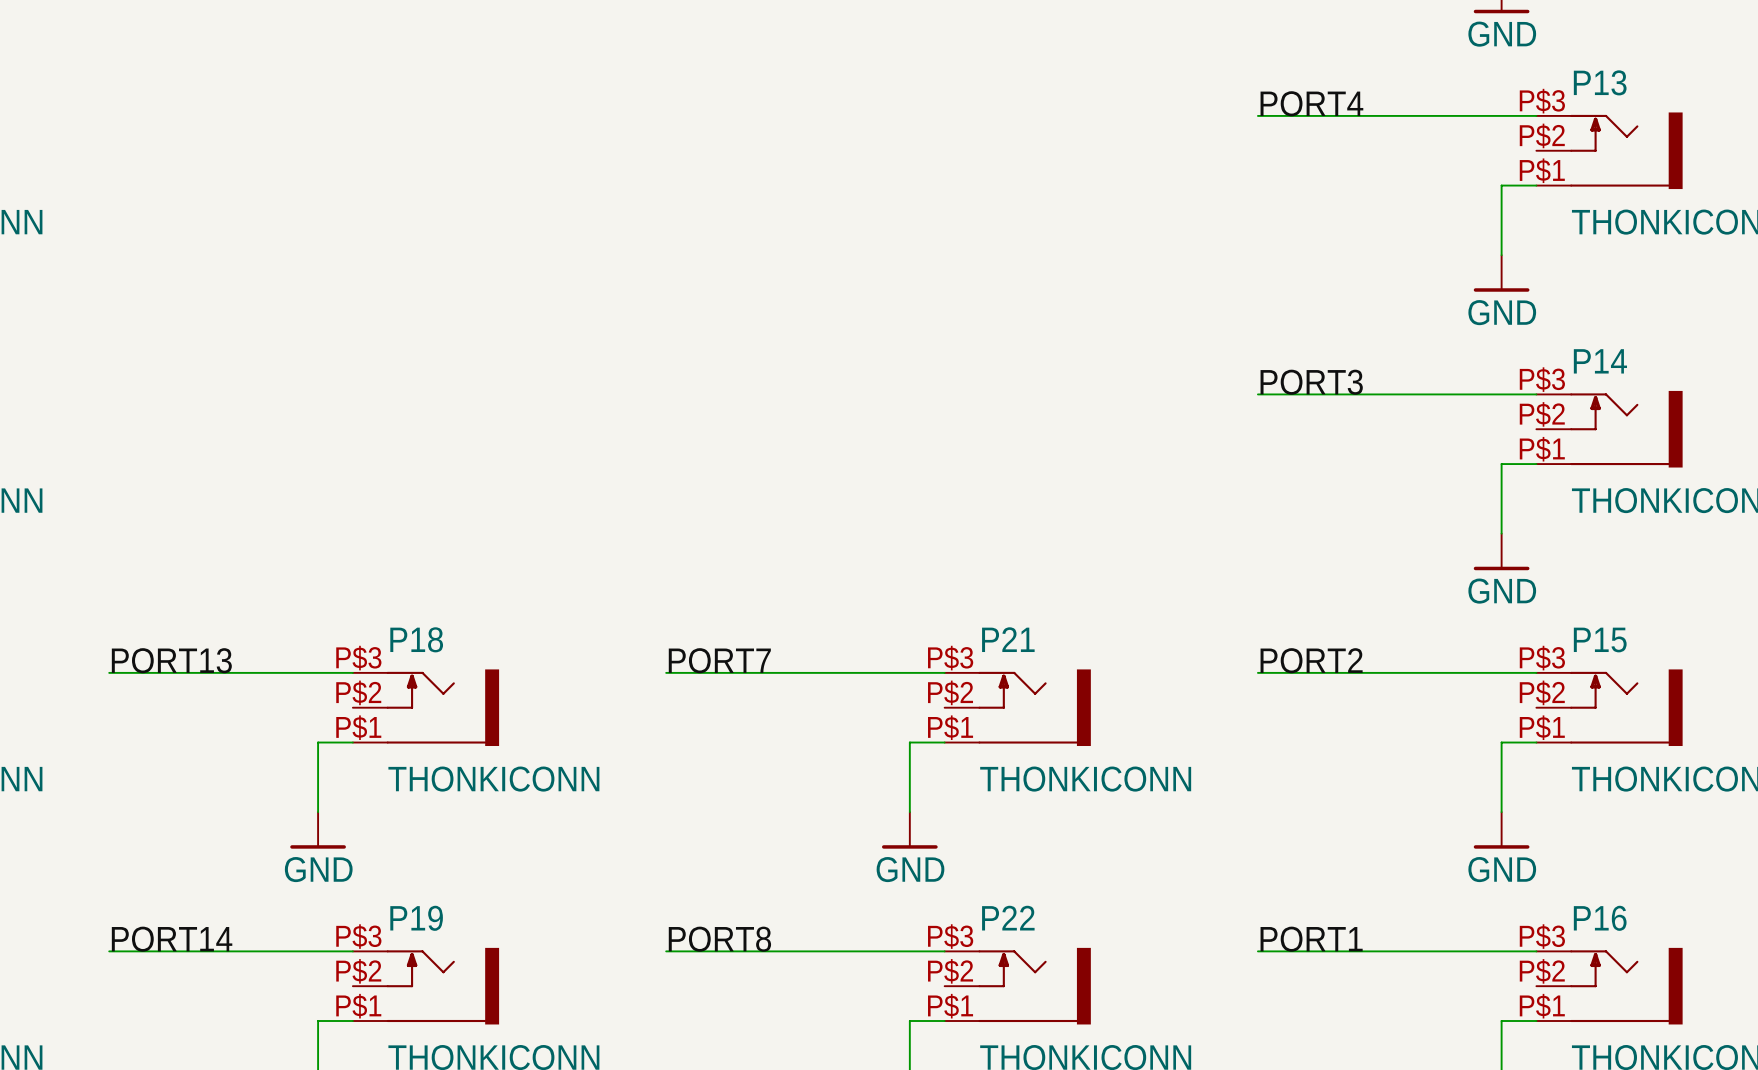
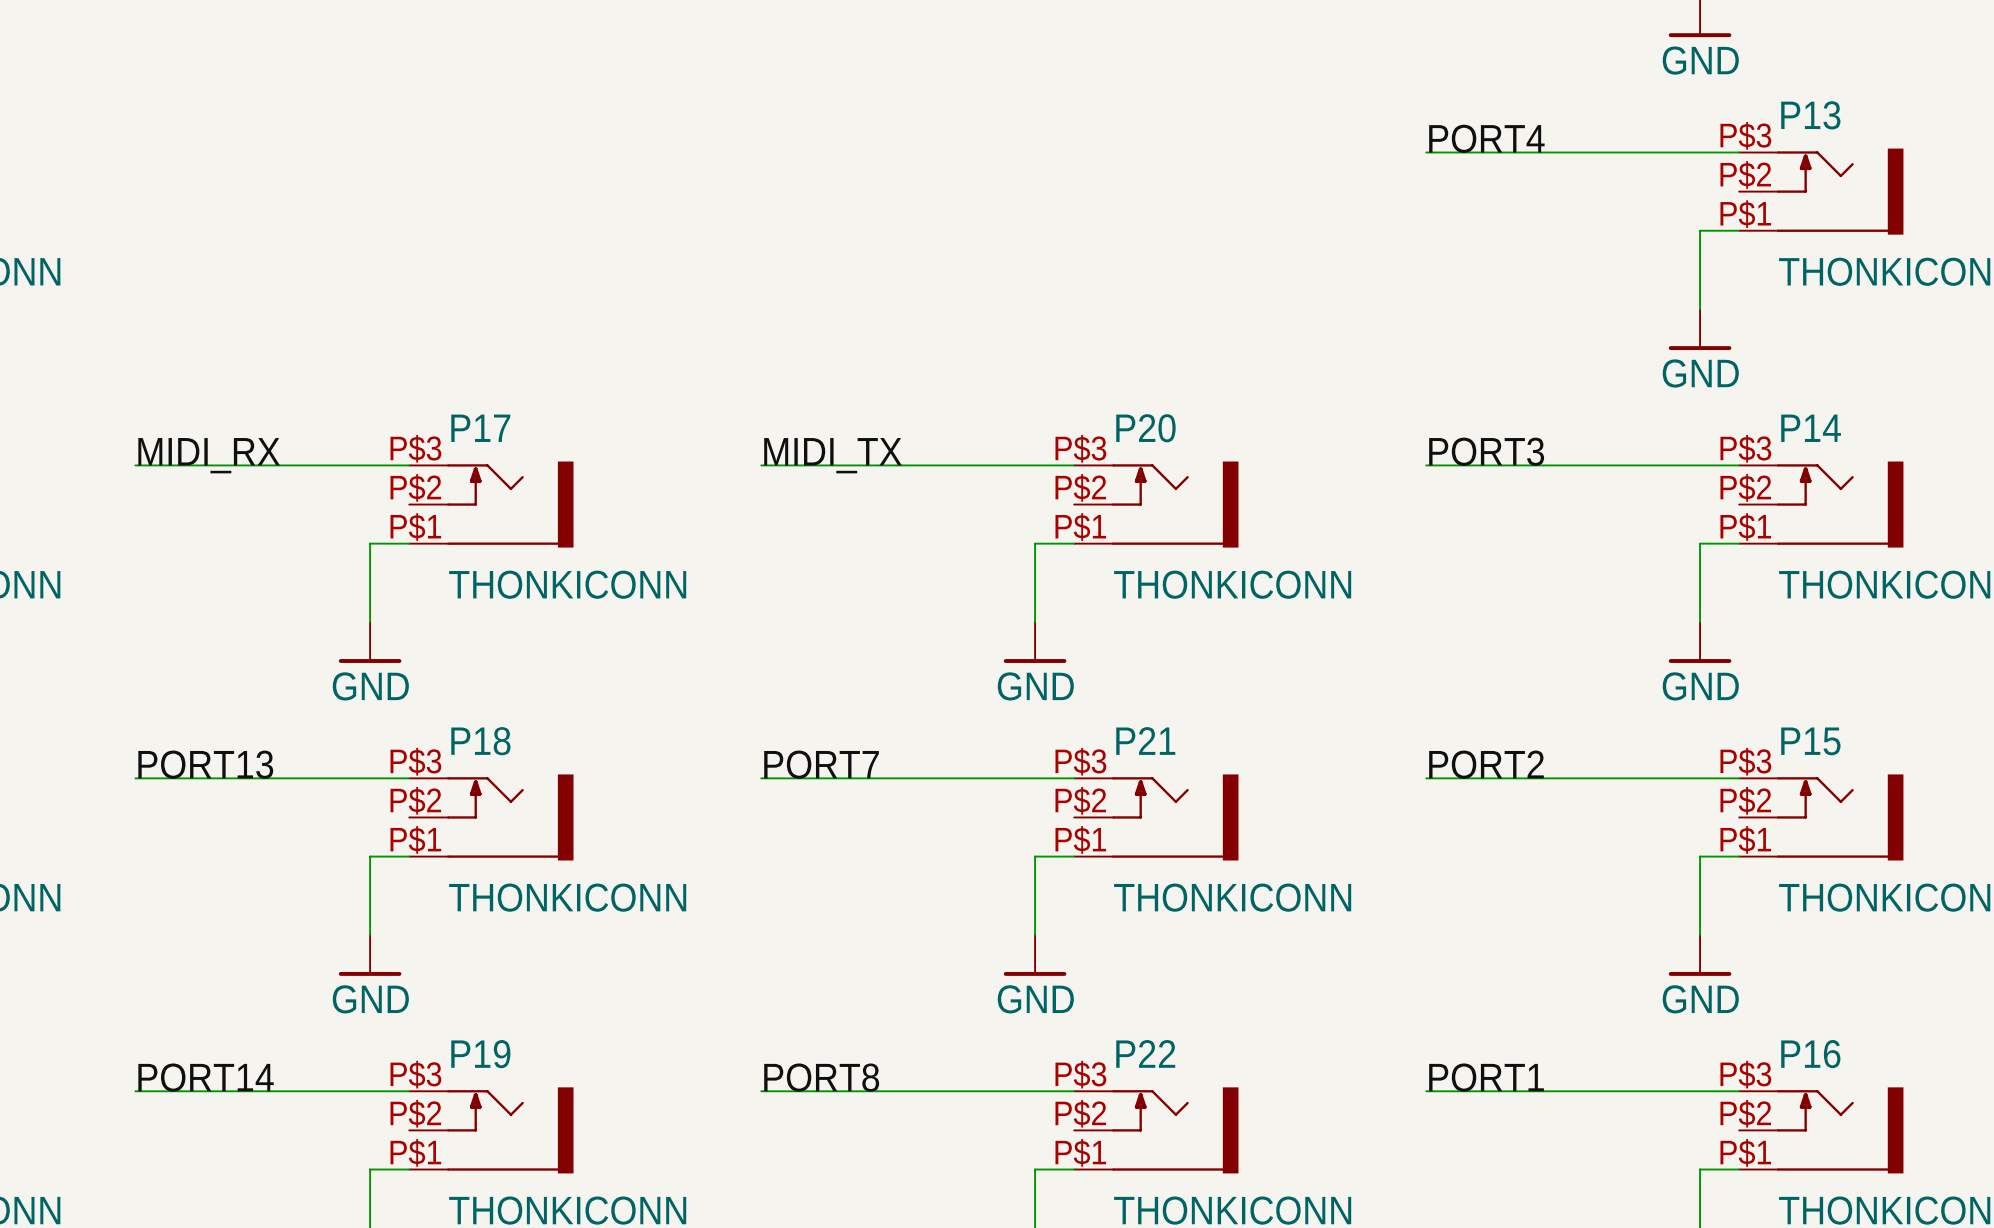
label: none -> MIDI_RX (209, 455)
label: none -> MIDI_TX (833, 455)
wire: none -> (135, 465) (409, 465)
wire: none -> (761, 465) (1074, 465)
P17: none -> THONKICONN (491, 504)
P20: none -> THONKICONN (1156, 504)
wire: none -> (409, 543) (370, 543) (370, 621)
wire: none -> (1074, 543) (1035, 543) (1035, 621)
power symbol: none -> GND (370, 642)
power symbol: none -> GND (1035, 642)

